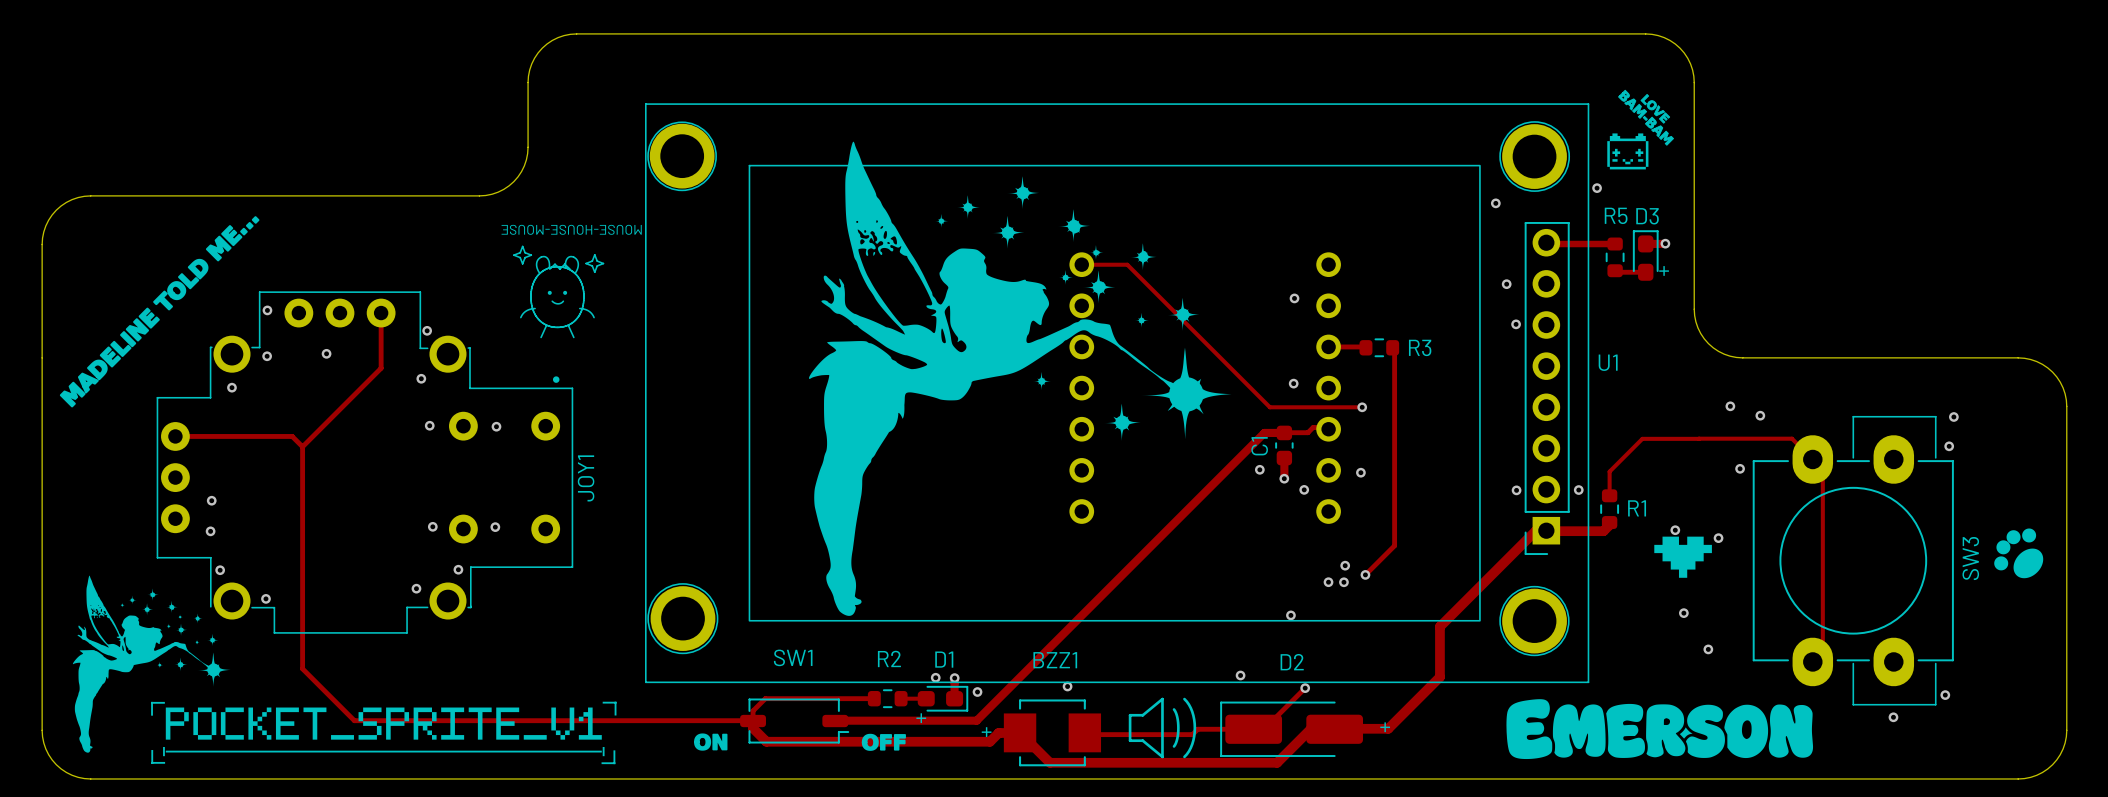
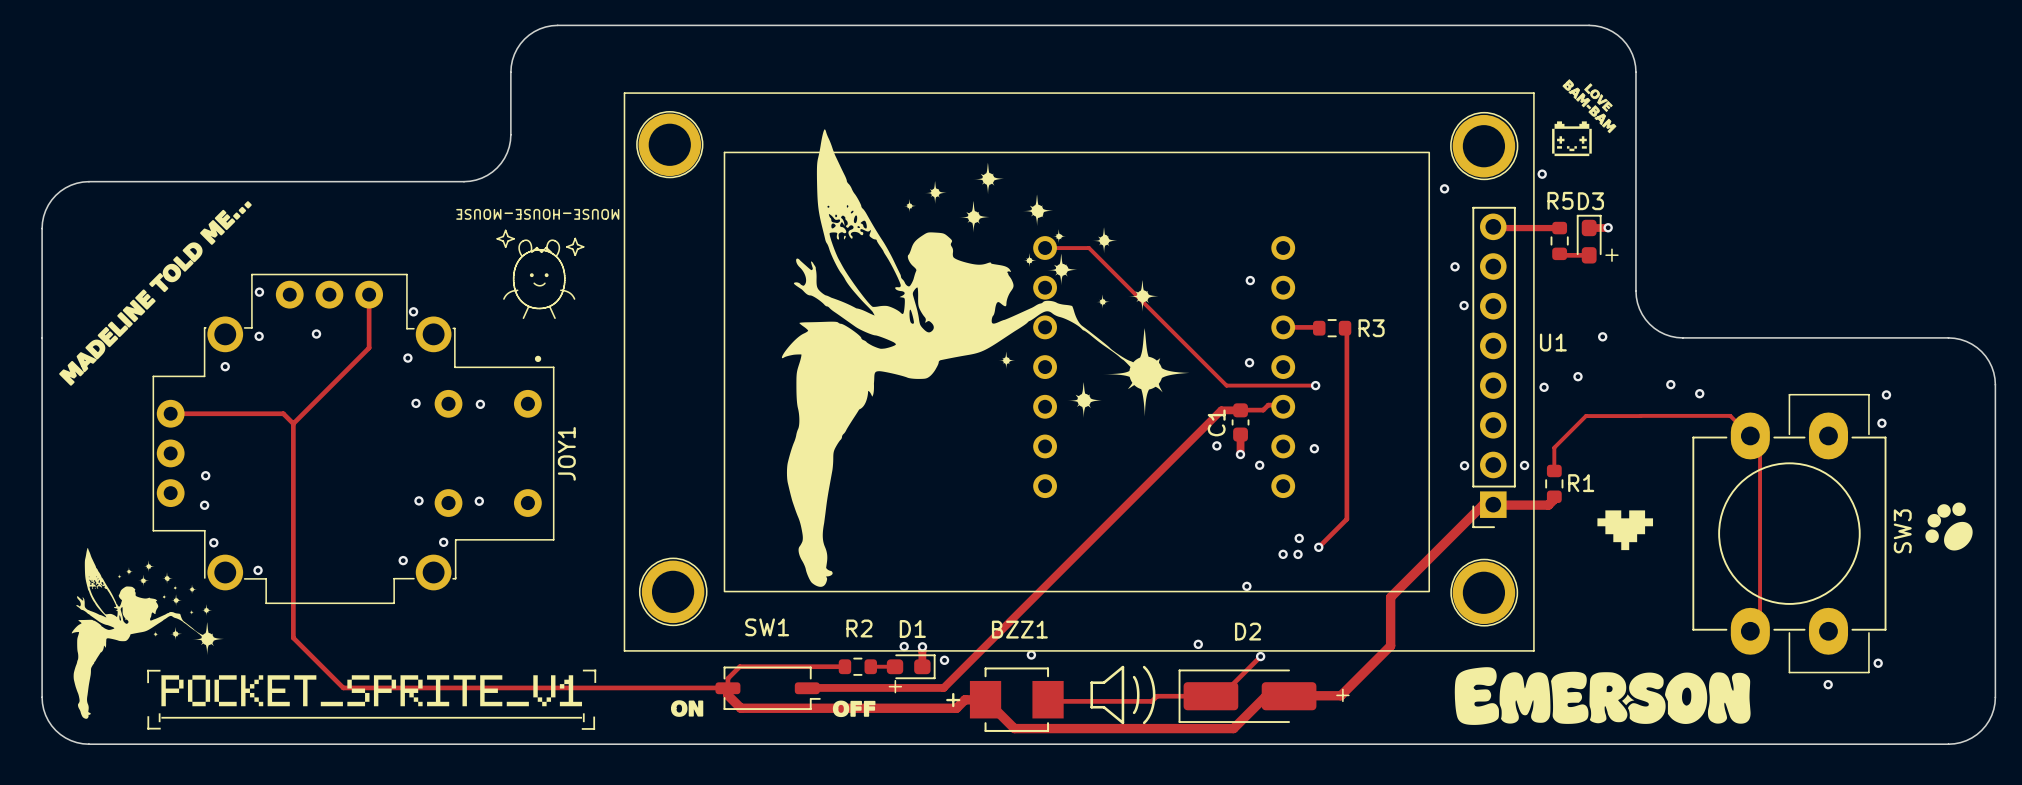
U1 footprint: [645, 103, 1590, 684] -> [623, 92, 1535, 652]
via: none -> (1602, 336)
via: none -> (1578, 376)
via: none -> (1544, 387)
via: (1740, 468) -> none
via: (1675, 530) -> none
via: (1718, 538) -> none
via: (1683, 613) -> none
via: (1708, 649) -> none

